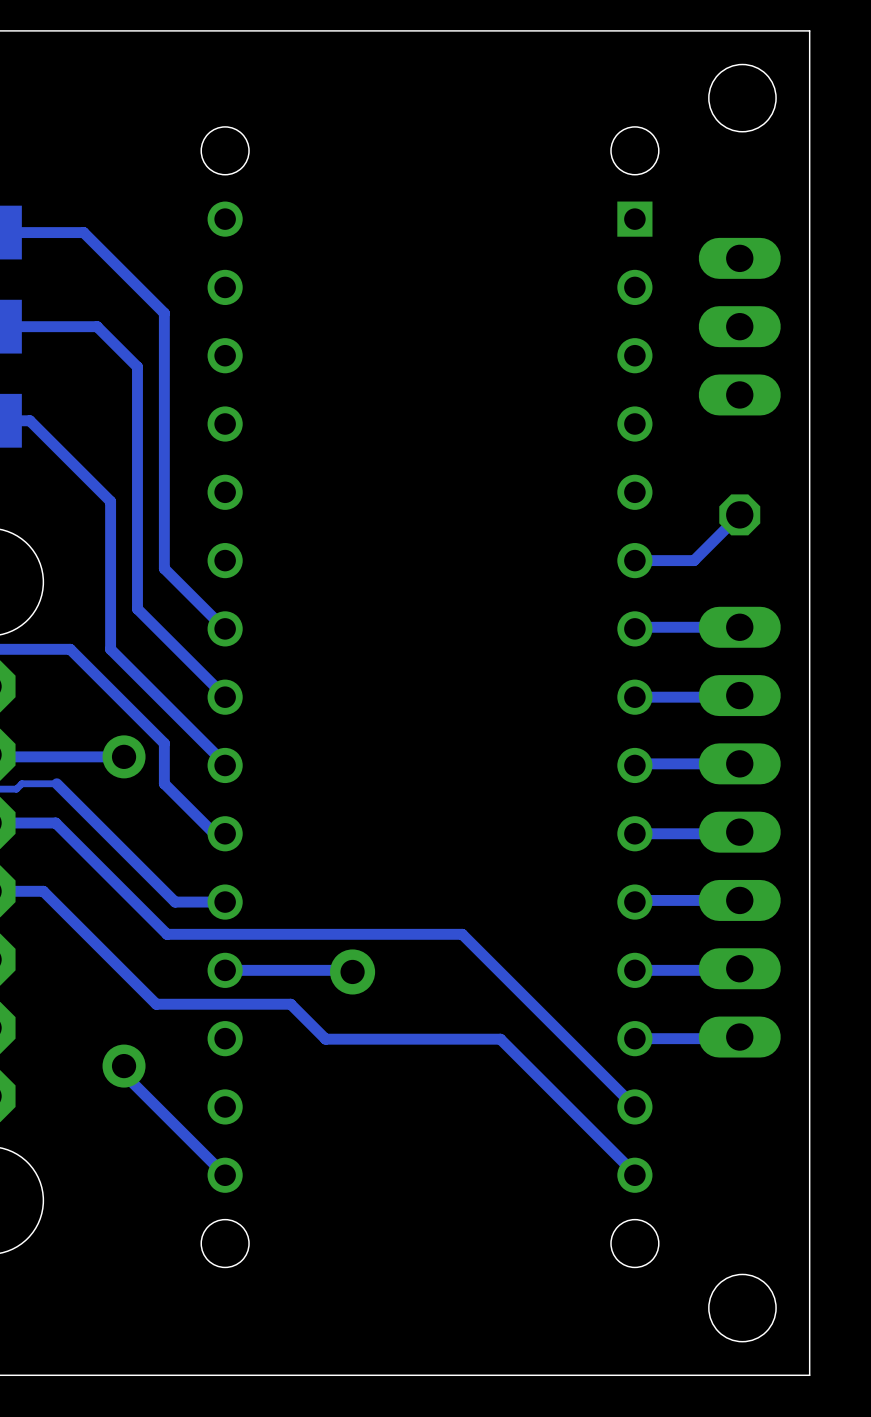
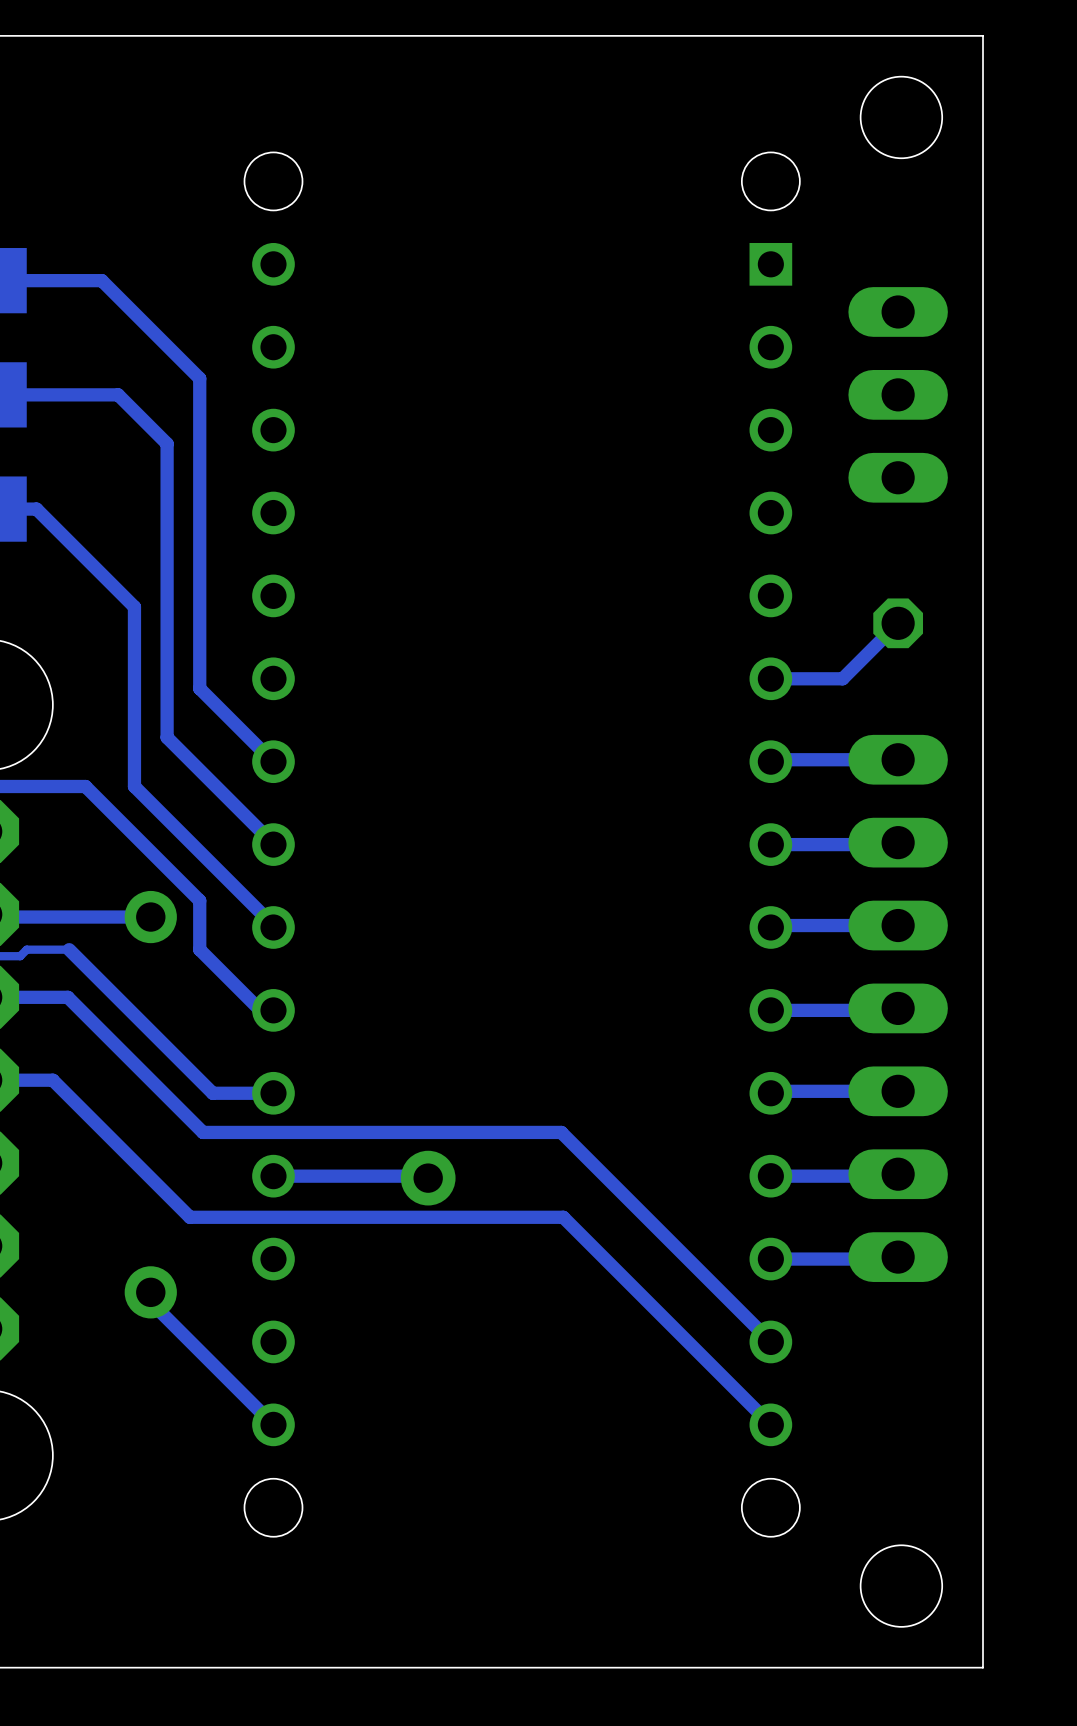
track: (290, 1004) (325, 1039) (500, 1039) (634, 1175) -> (353, 1217) (563, 1217) (770, 1424)

